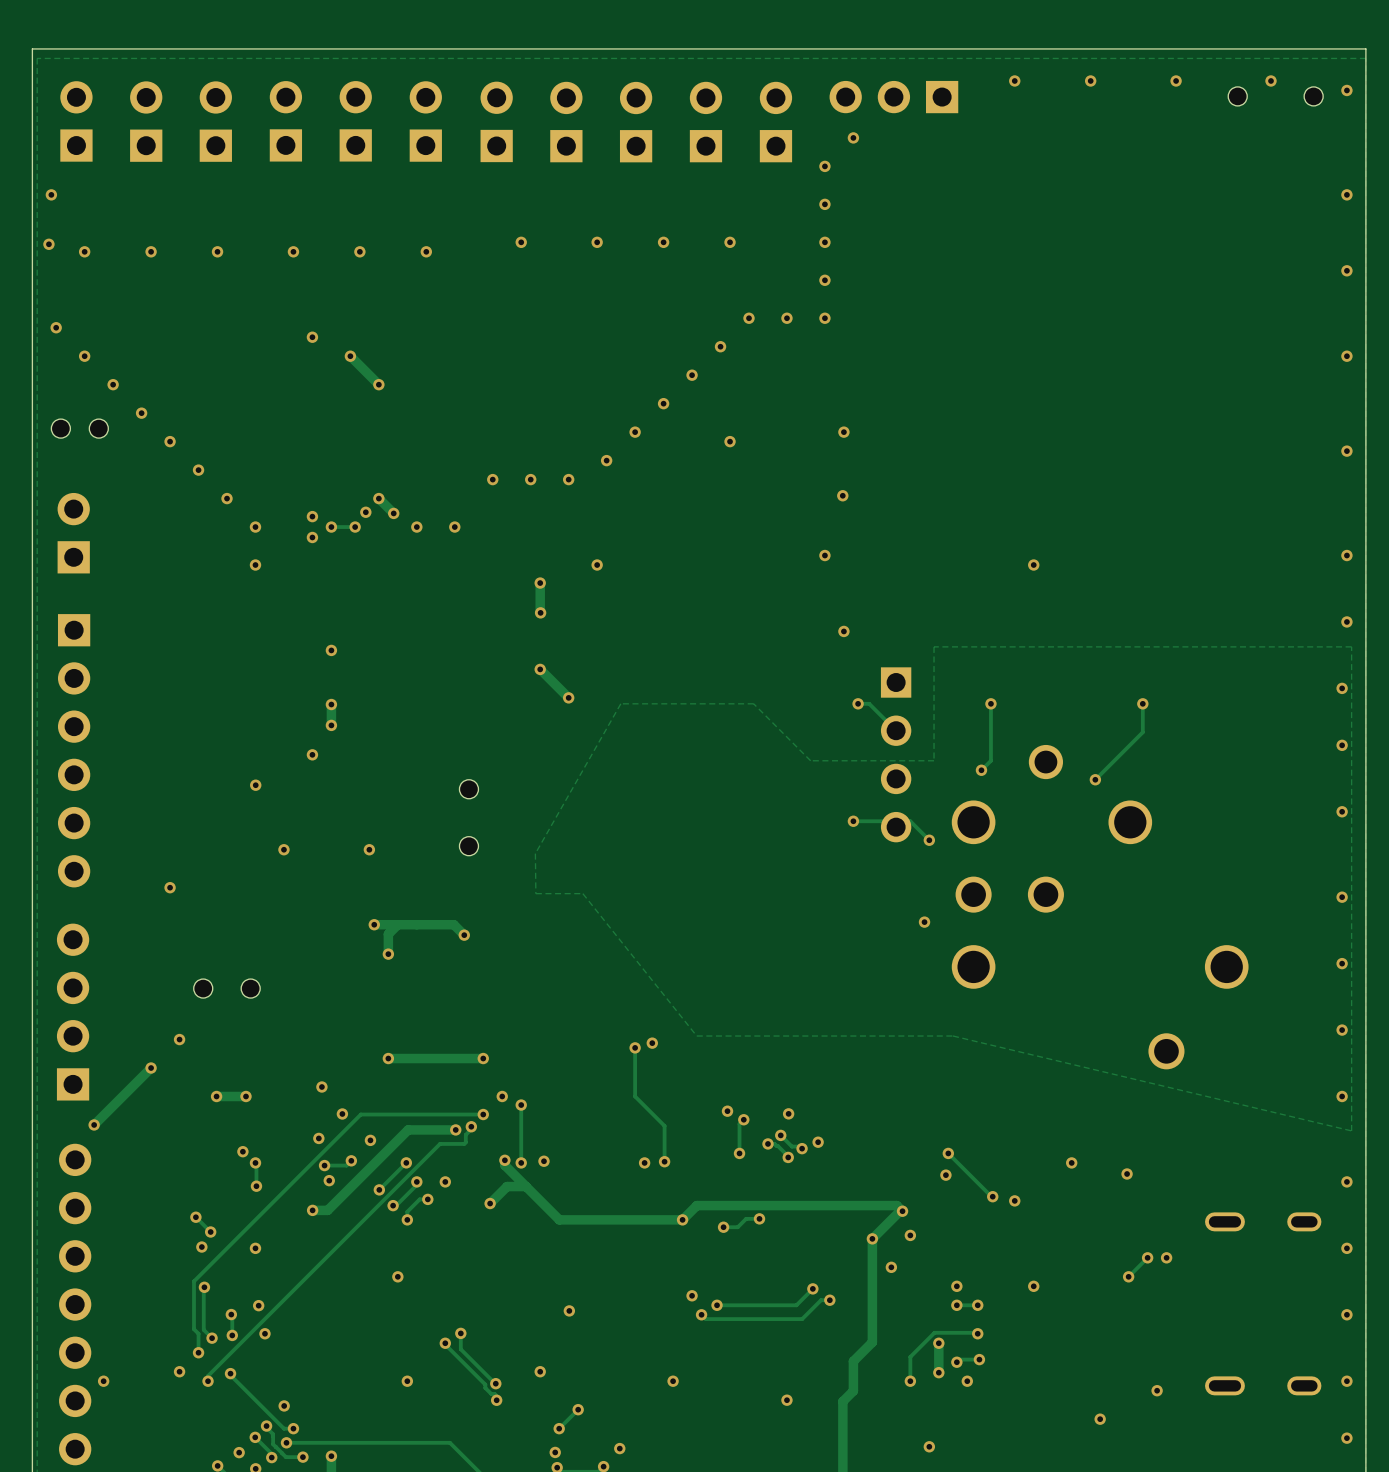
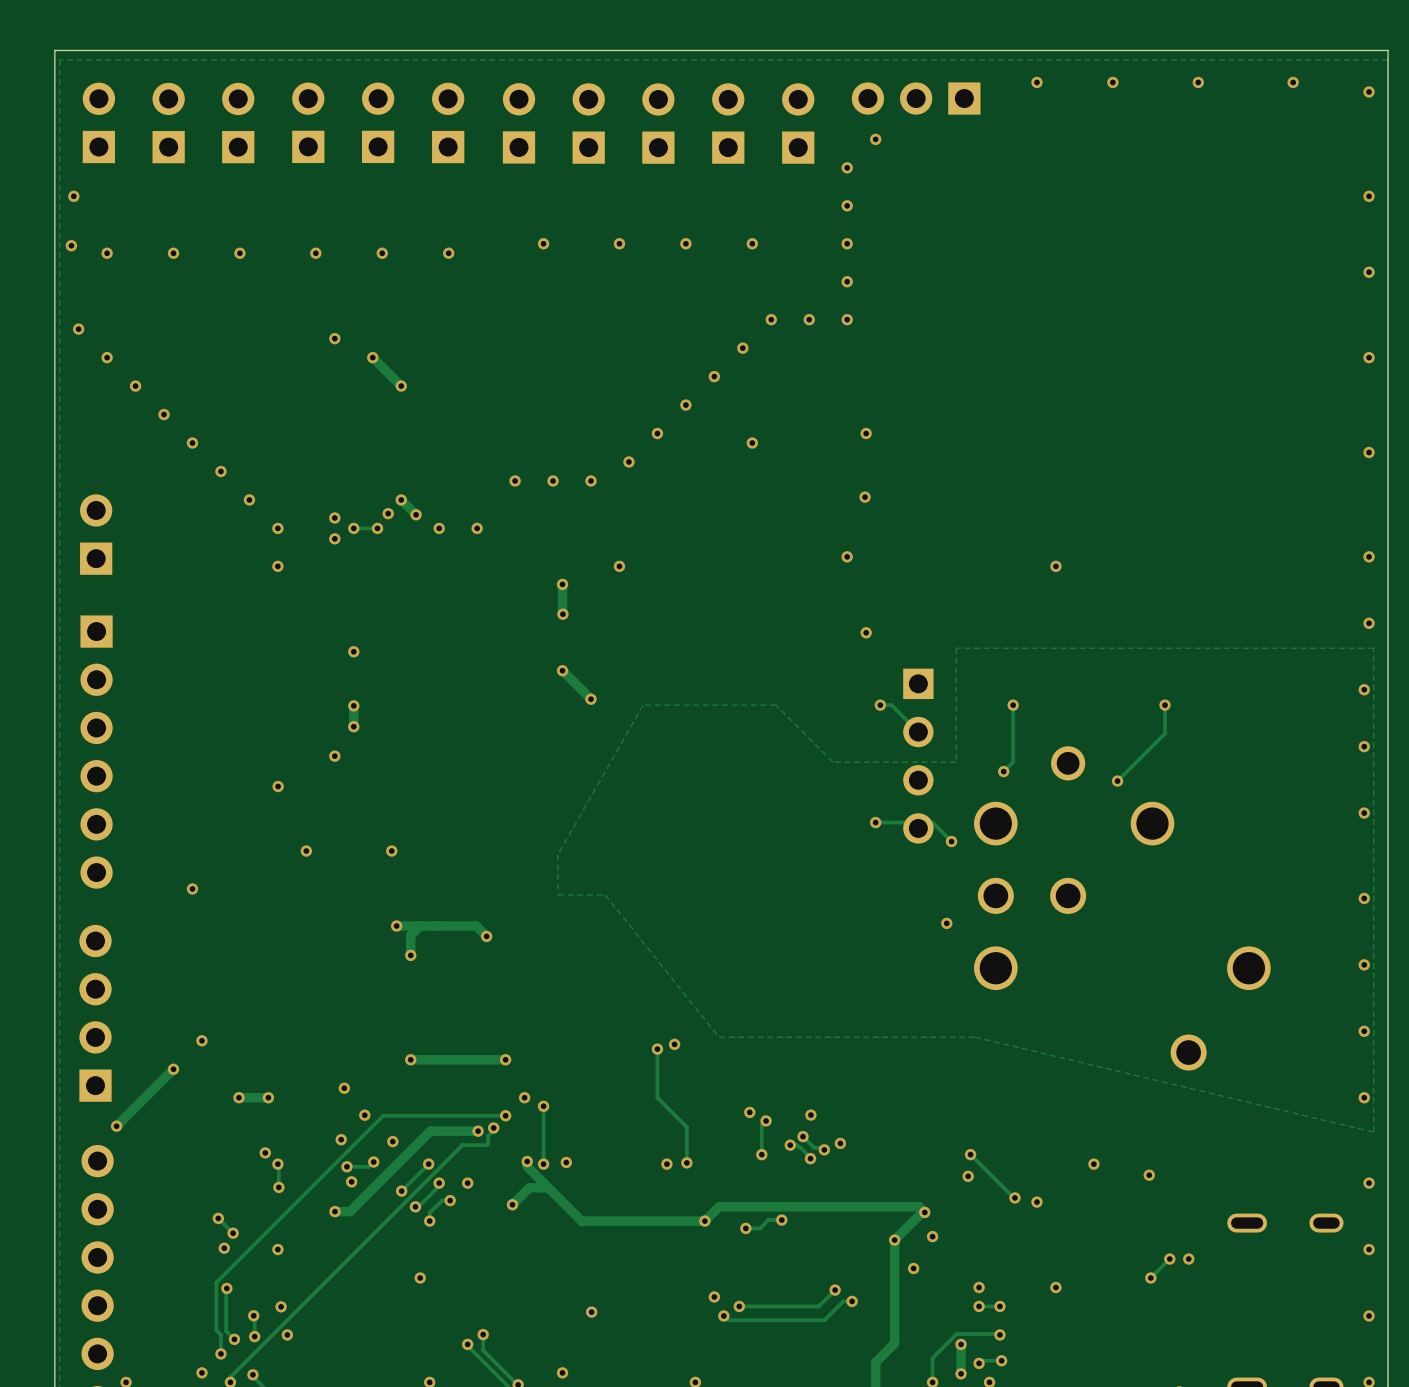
part: (1237, 96) -> none
part: (1313, 96) -> none
part: (60, 428) -> none
part: (98, 428) -> none
part: (468, 789) -> none
part: (468, 846) -> none
part: (203, 988) -> none
part: (250, 988) -> none

